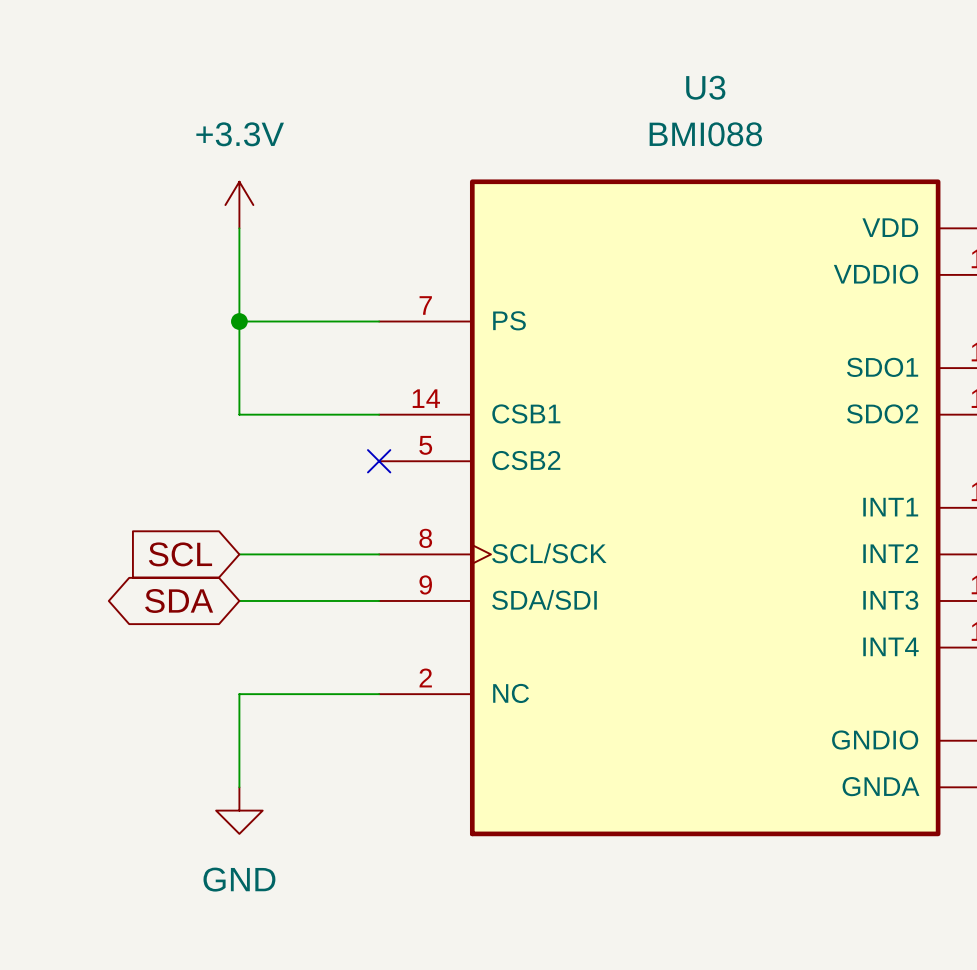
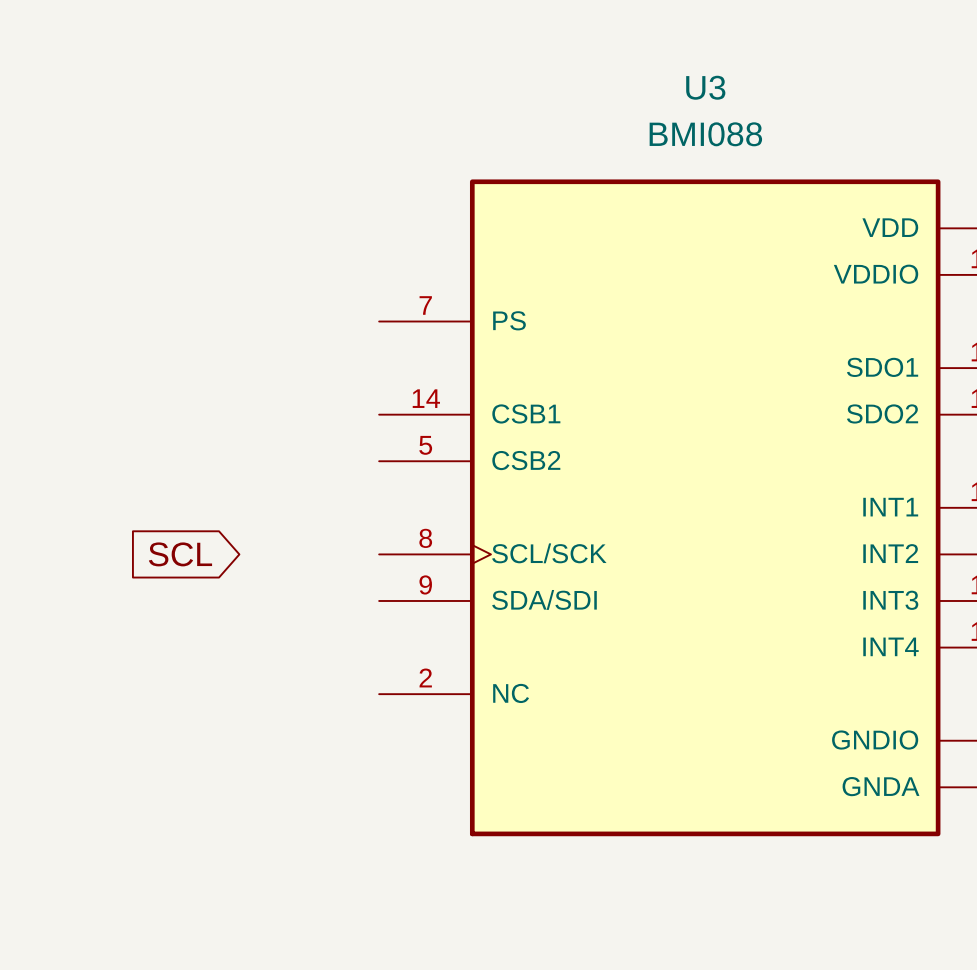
power symbol: +3.3V (239, 205) -> none
wire: (239, 228) (239, 414) (379, 414) -> none
wire: (239, 321) (379, 321) -> none
junction: (239, 321) -> none
no-connect mark: (379, 461) -> none
wire: (239, 554) (379, 554) -> none
global label: SDA (179, 600) -> none
wire: (239, 600) (379, 600) -> none
wire: (379, 694) (239, 694) (239, 787) -> none
power symbol: GND (239, 810) -> none

